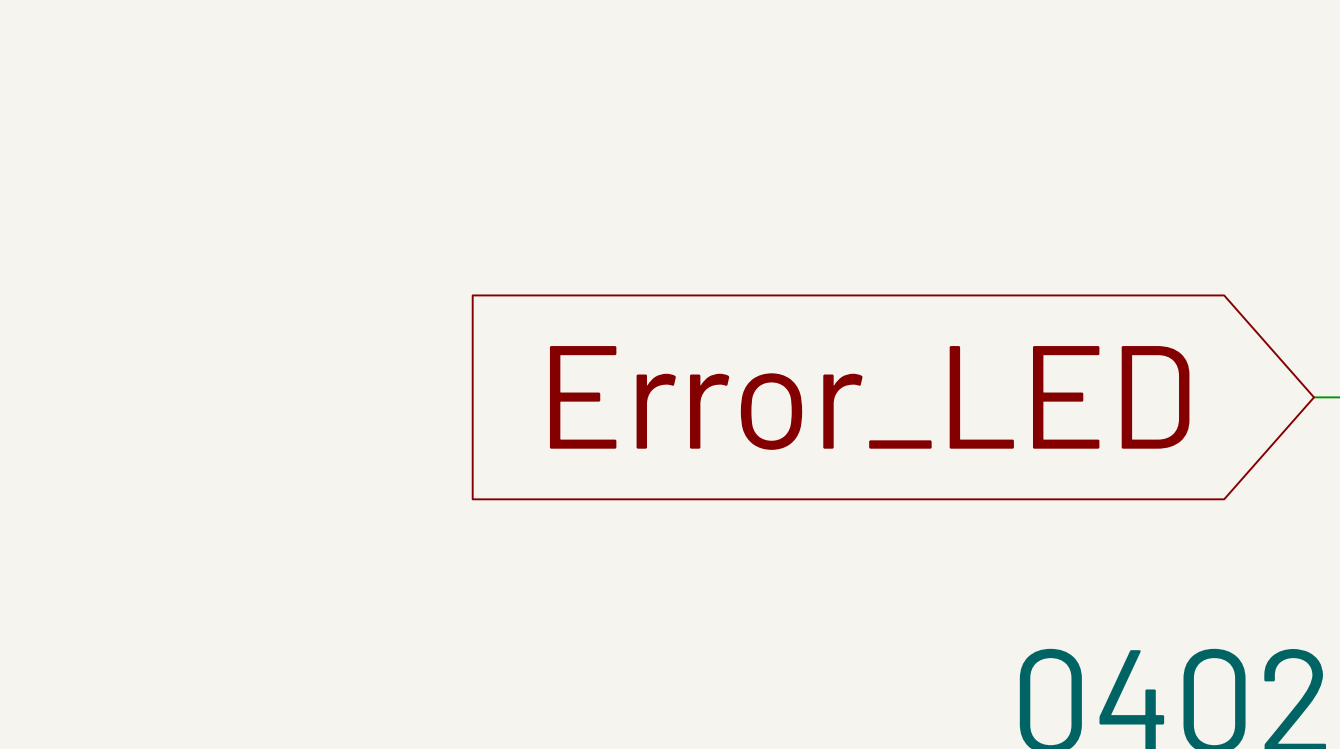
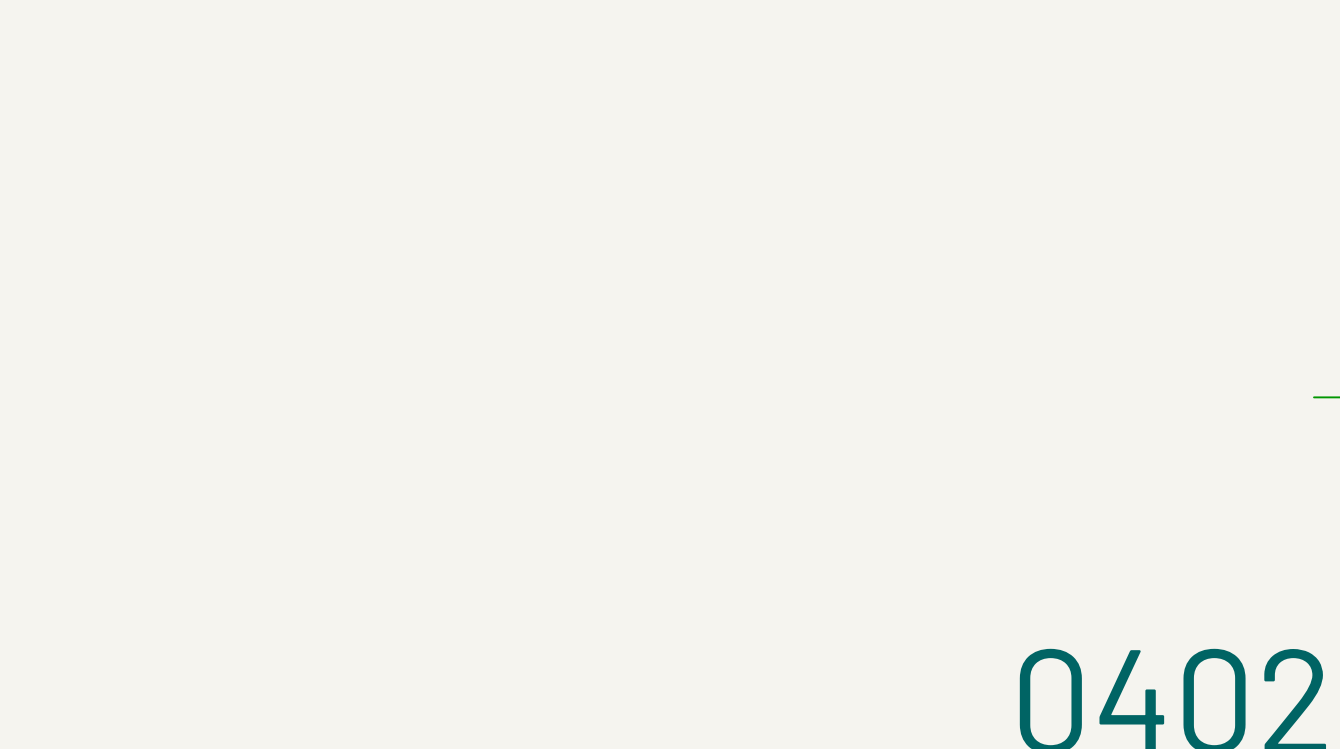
global label: Error_LED (869, 397) -> none

